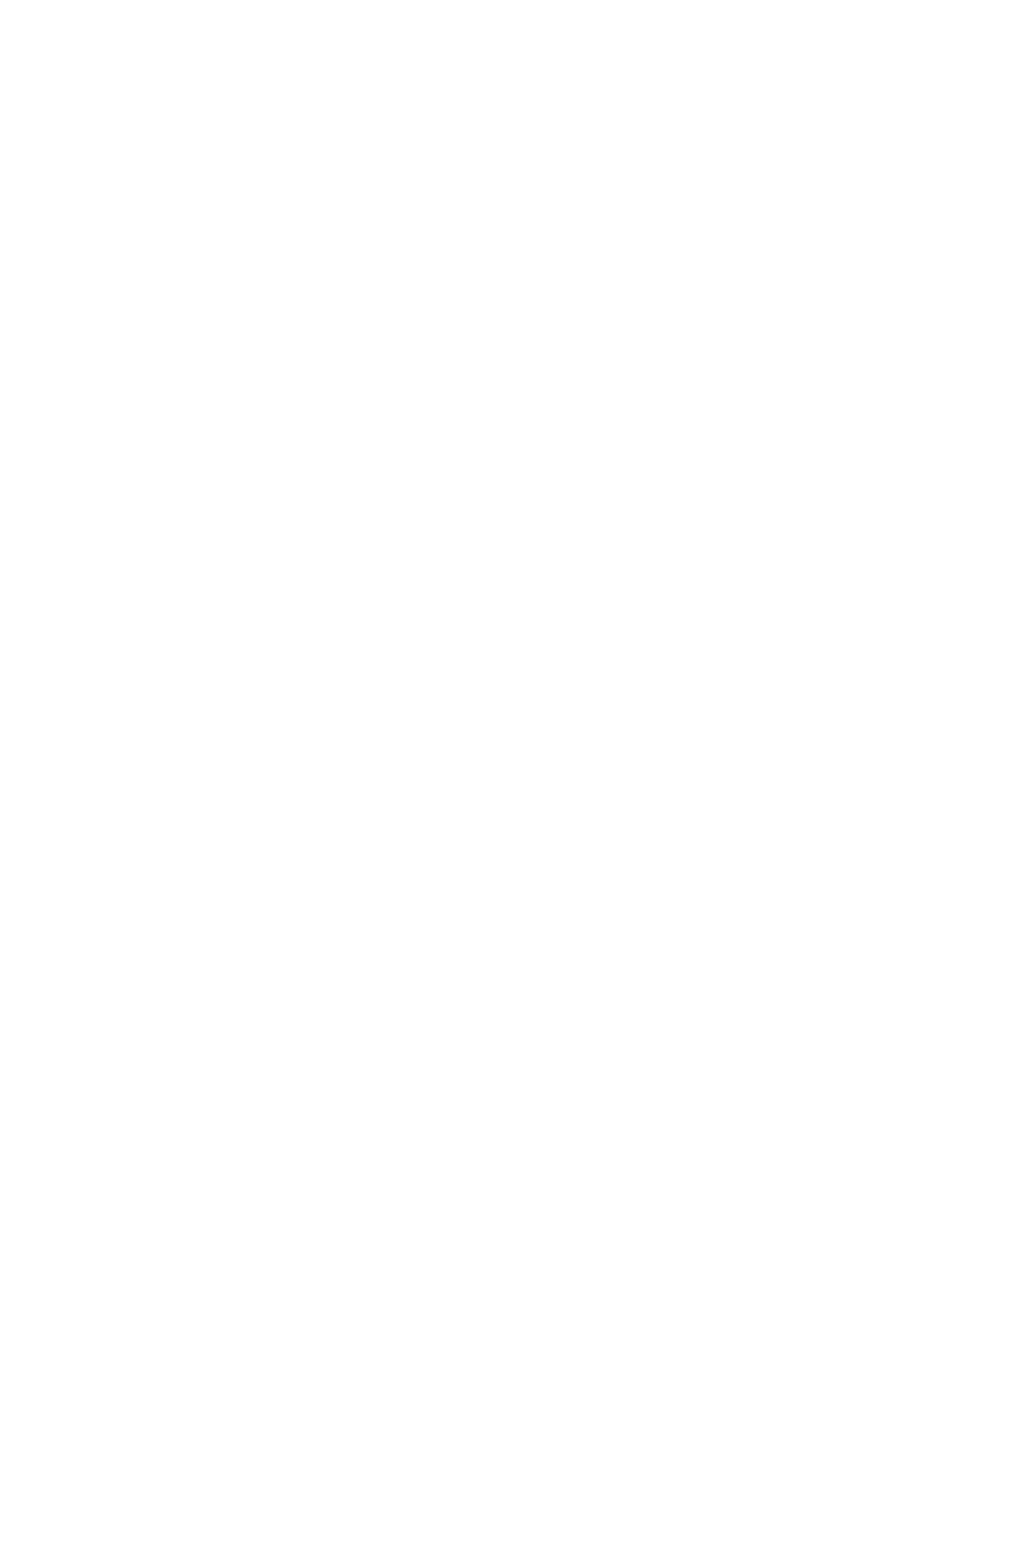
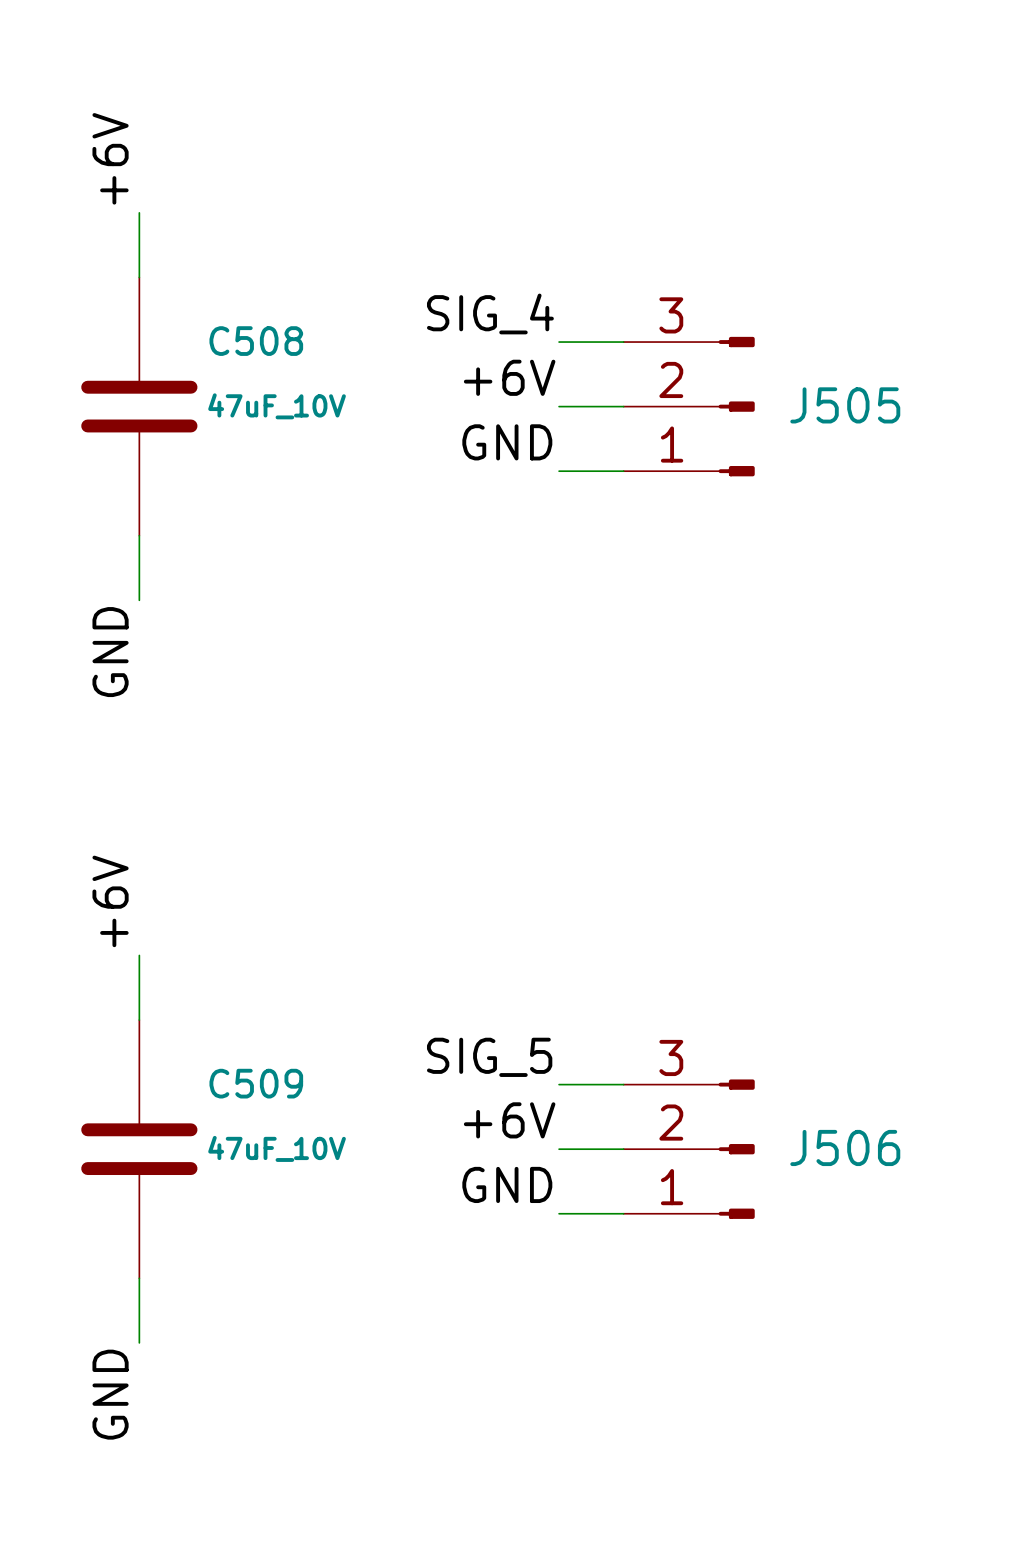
label: none -> +6V (110, 158)
wire: none -> (139, 212) (139, 277)
label: none -> SIG_4 (490, 313)
wire: none -> (559, 342) (623, 342)
label: none -> +6V (509, 377)
C508: none -> 47uF_10V (139, 406)
wire: none -> (559, 406) (623, 406)
J505: none -> (689, 406)
label: none -> GND (507, 442)
wire: none -> (559, 471) (623, 471)
wire: none -> (139, 535) (139, 600)
label: none -> GND (110, 652)
label: none -> +6V (110, 901)
wire: none -> (139, 955) (139, 1020)
label: none -> SIG_5 (489, 1057)
wire: none -> (559, 1084) (623, 1084)
label: none -> +6V (509, 1120)
C509: none -> 47uF_10V (139, 1149)
wire: none -> (559, 1149) (623, 1149)
J506: none -> (689, 1149)
label: none -> GND (507, 1184)
wire: none -> (559, 1213) (623, 1213)
wire: none -> (139, 1278) (139, 1342)
label: none -> GND (110, 1394)

